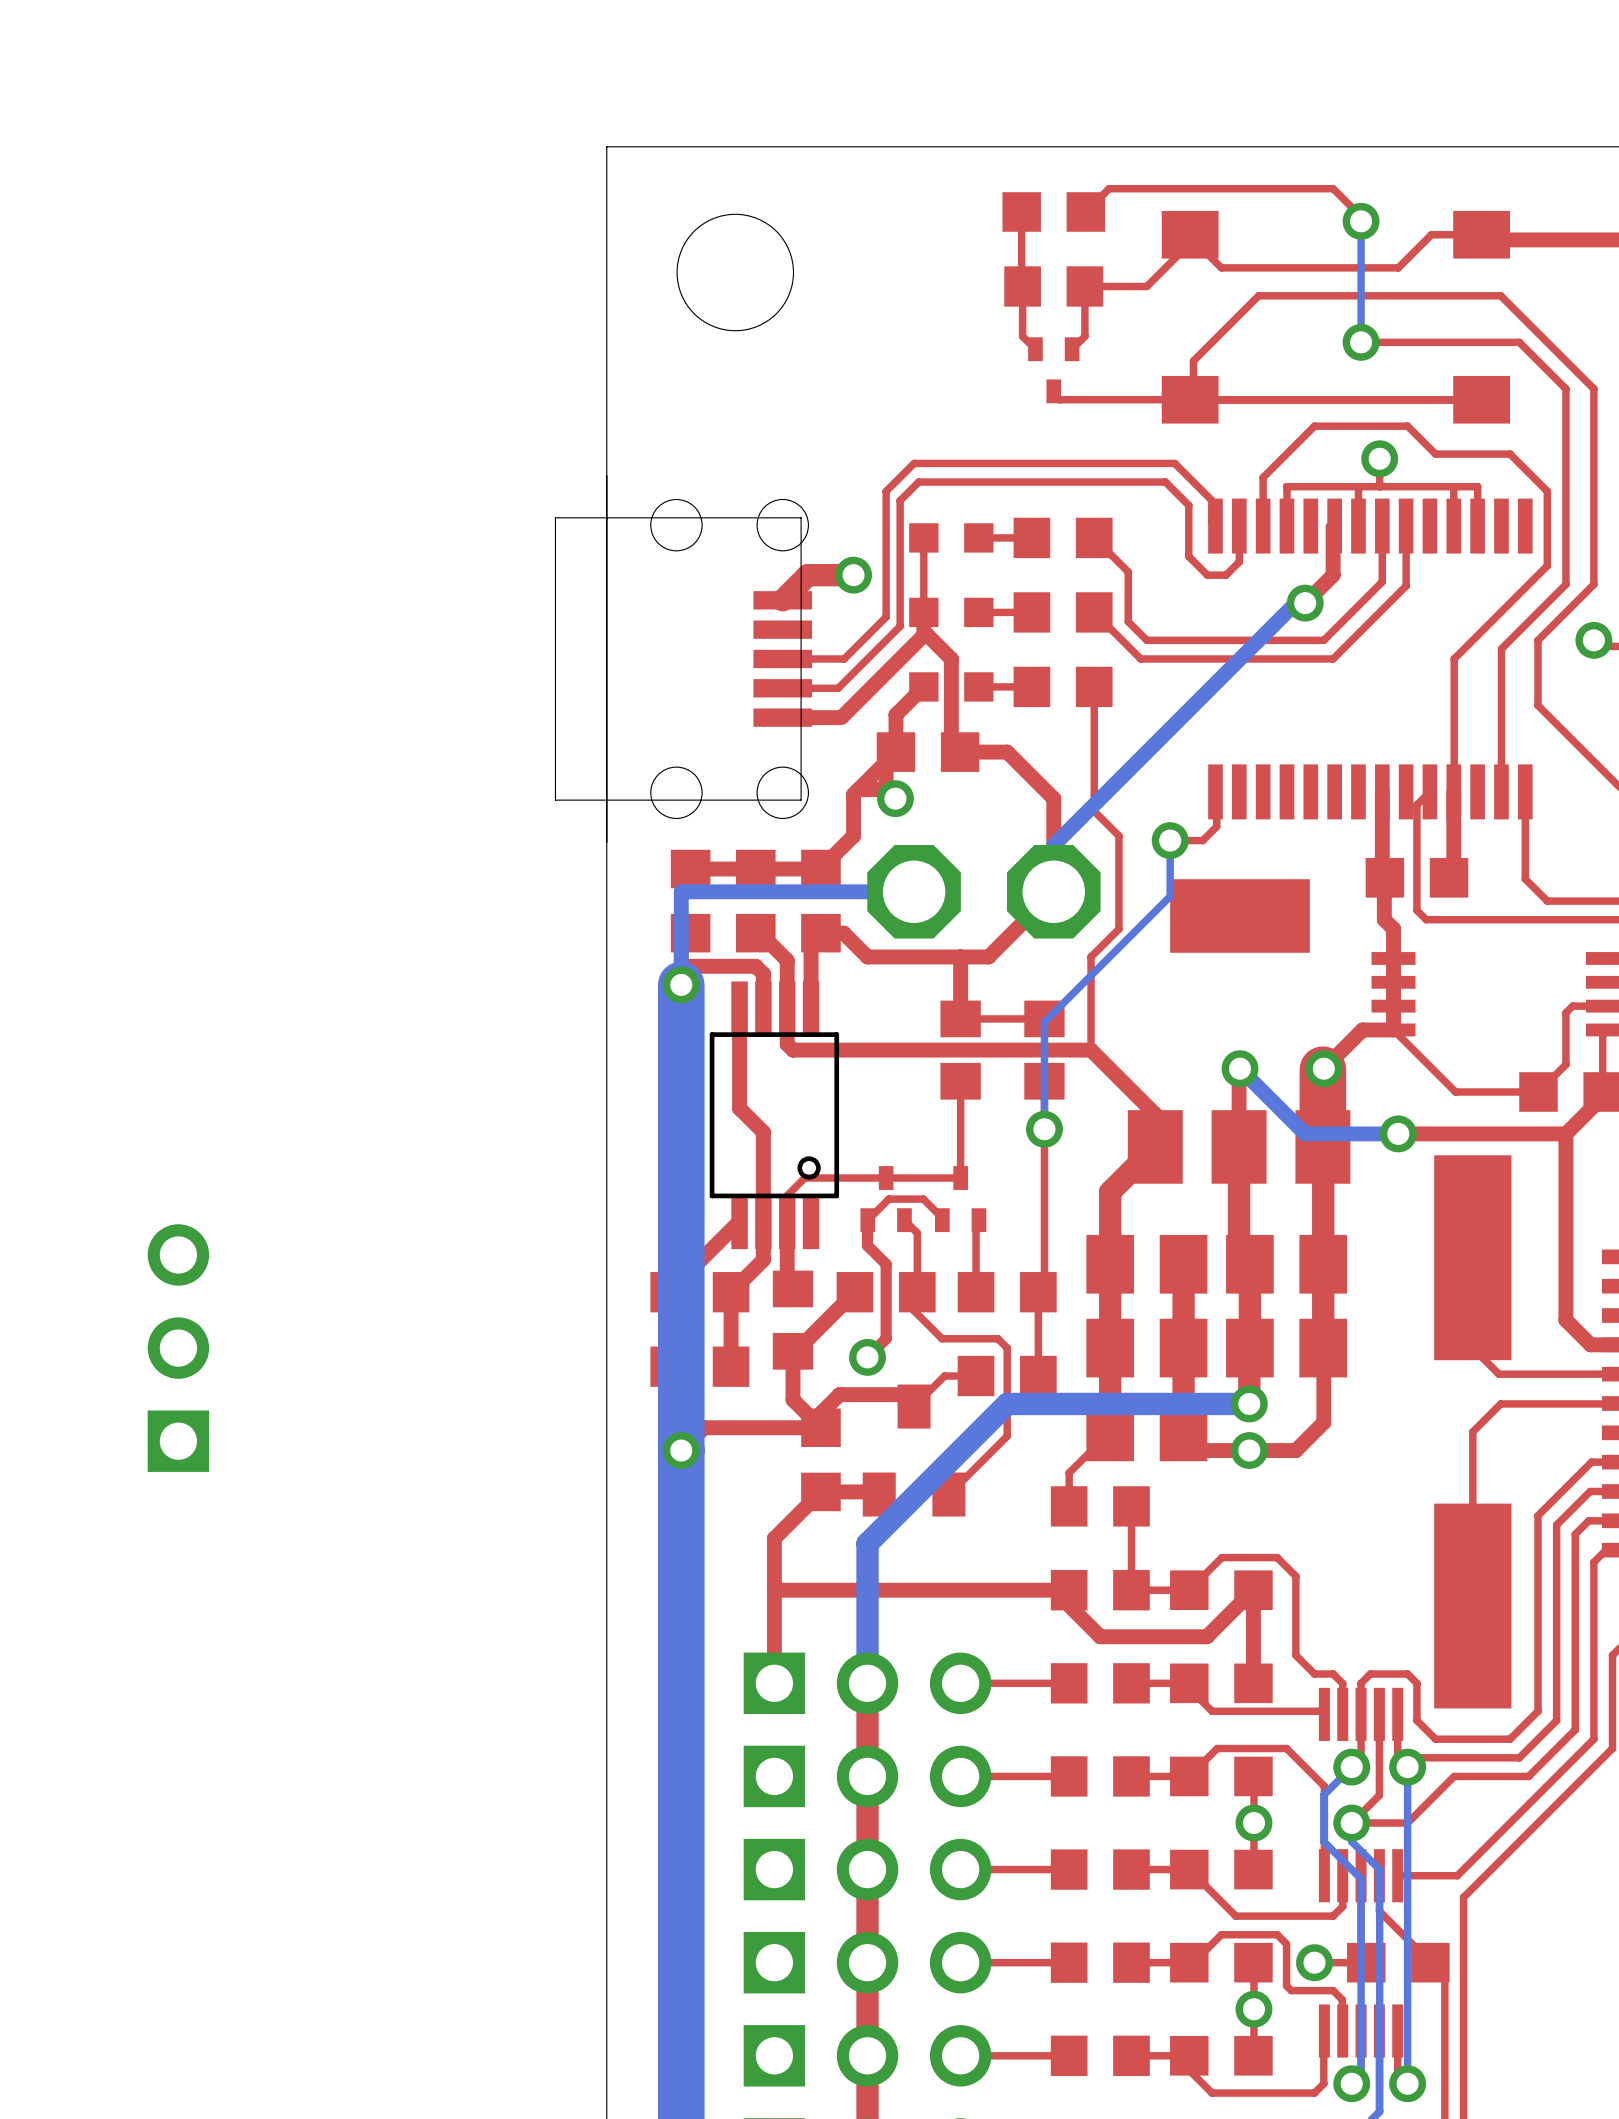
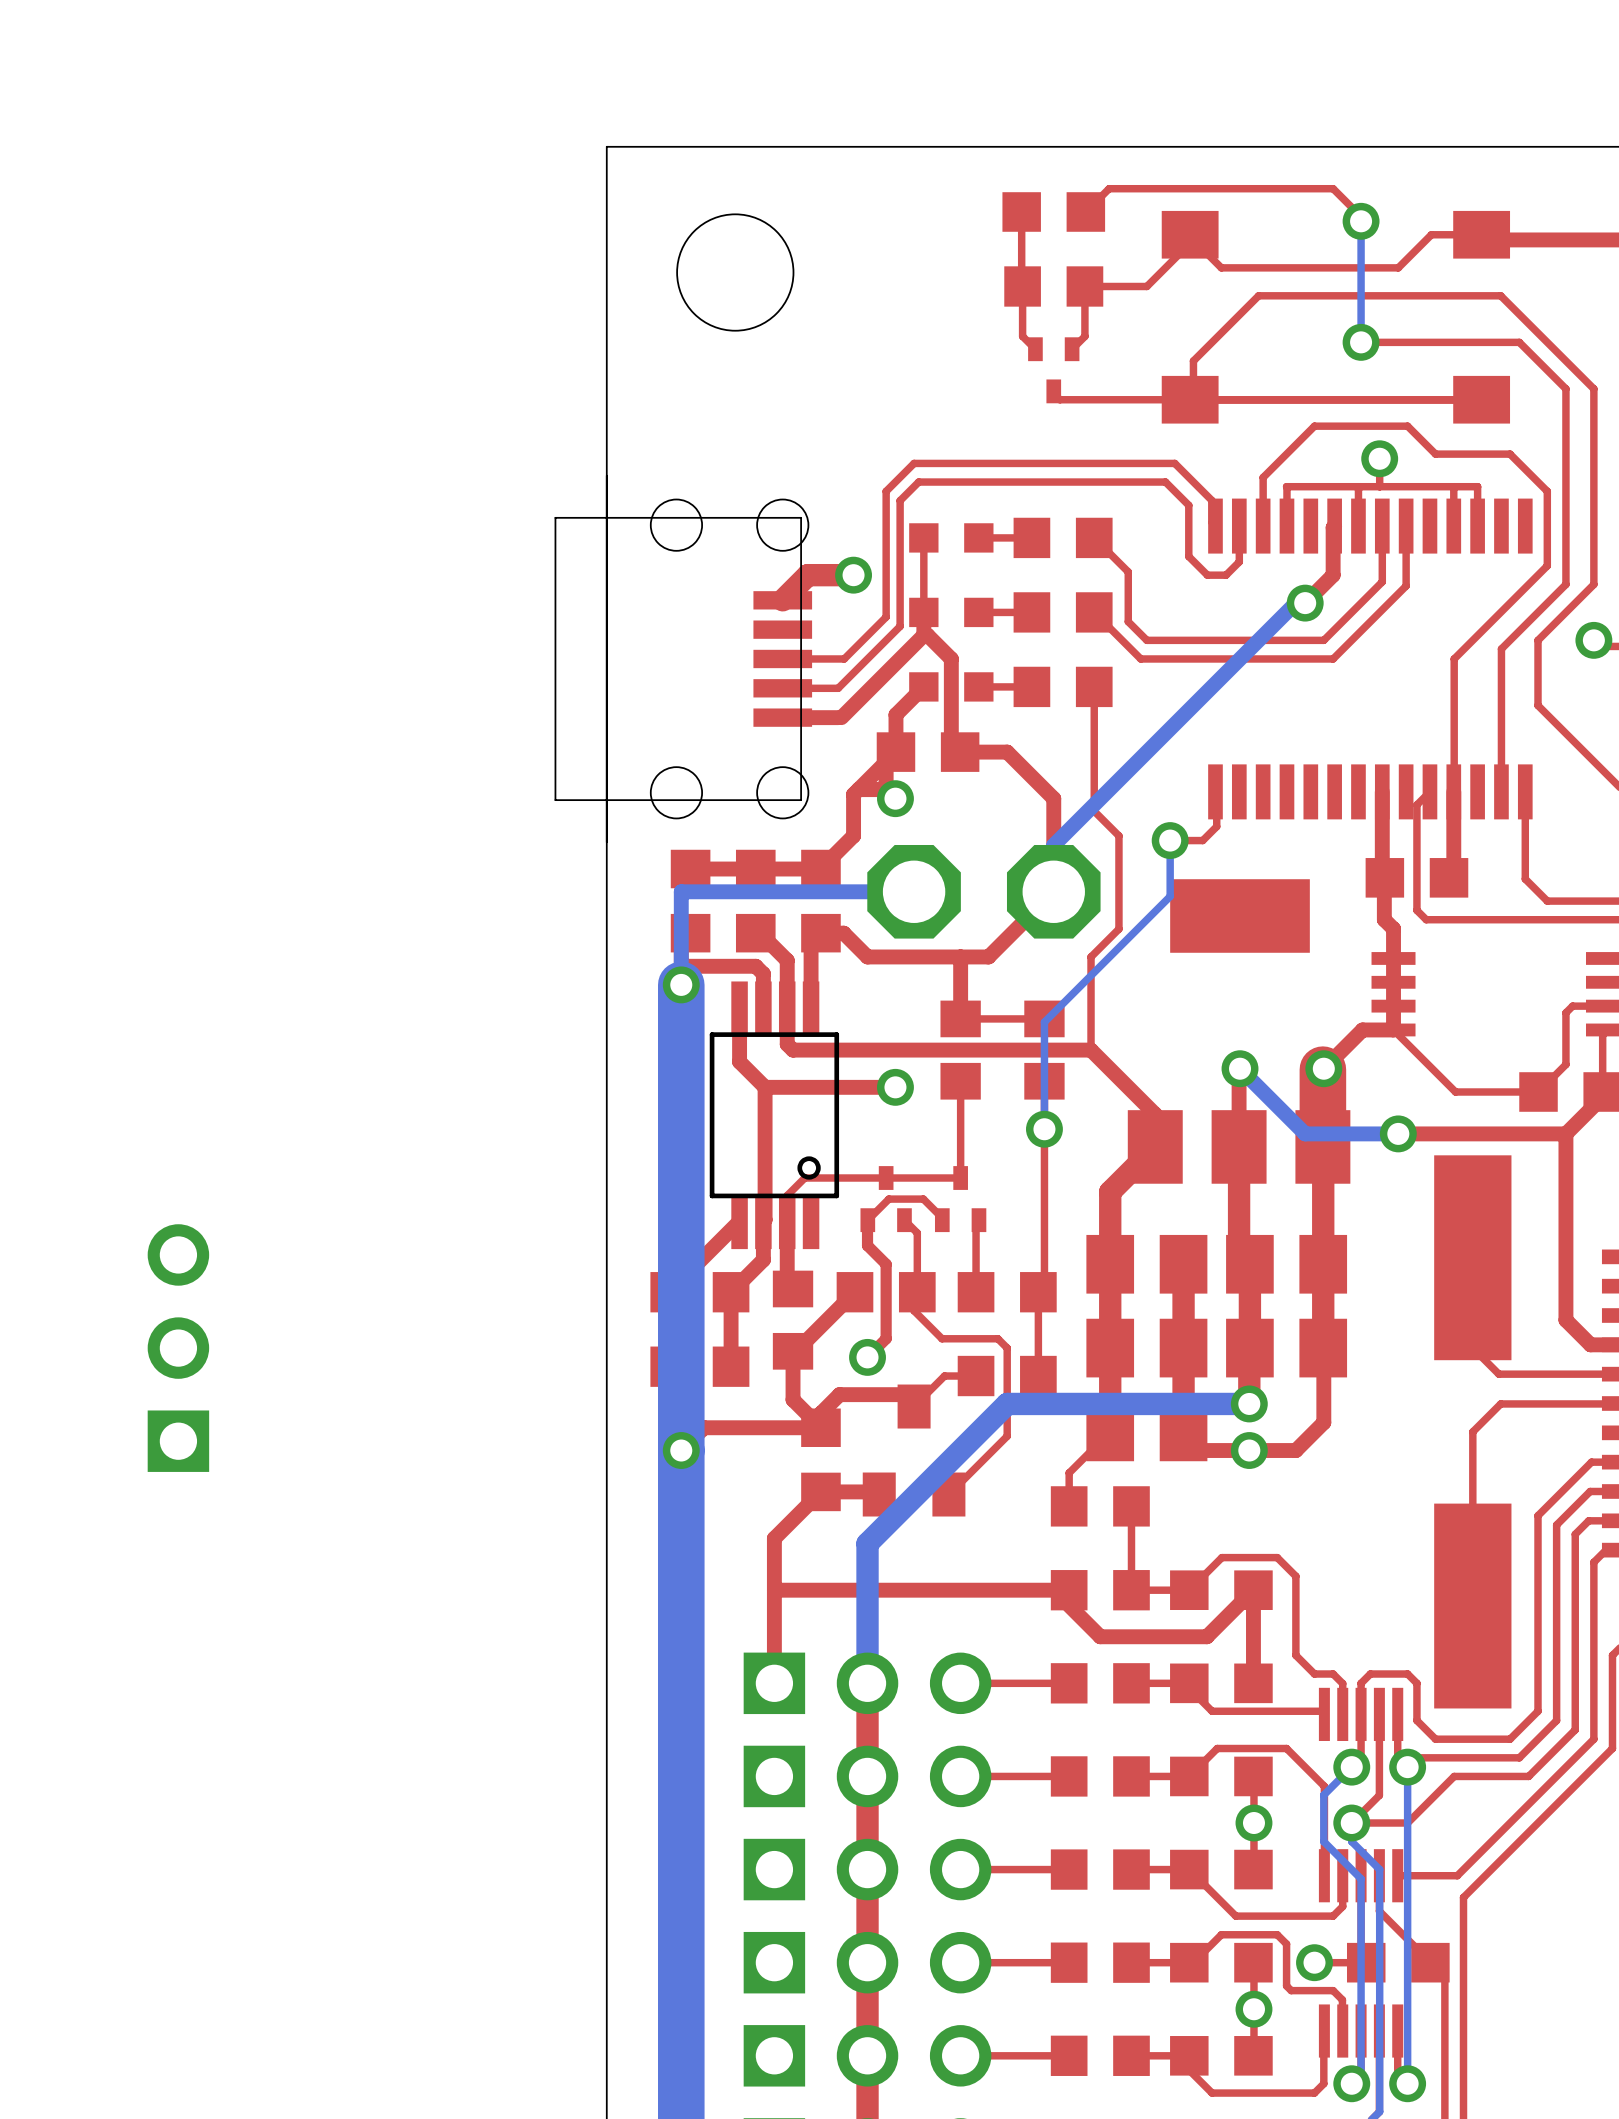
top track: (739, 1061) (739, 1108) (763, 1132) (763, 1221) -> (765, 1087) (765, 1219) (763, 1221)
top track: none -> (739, 1061) (765, 1087)
top track: none -> (895, 1087) (765, 1087)
via: none -> (895, 1087)

